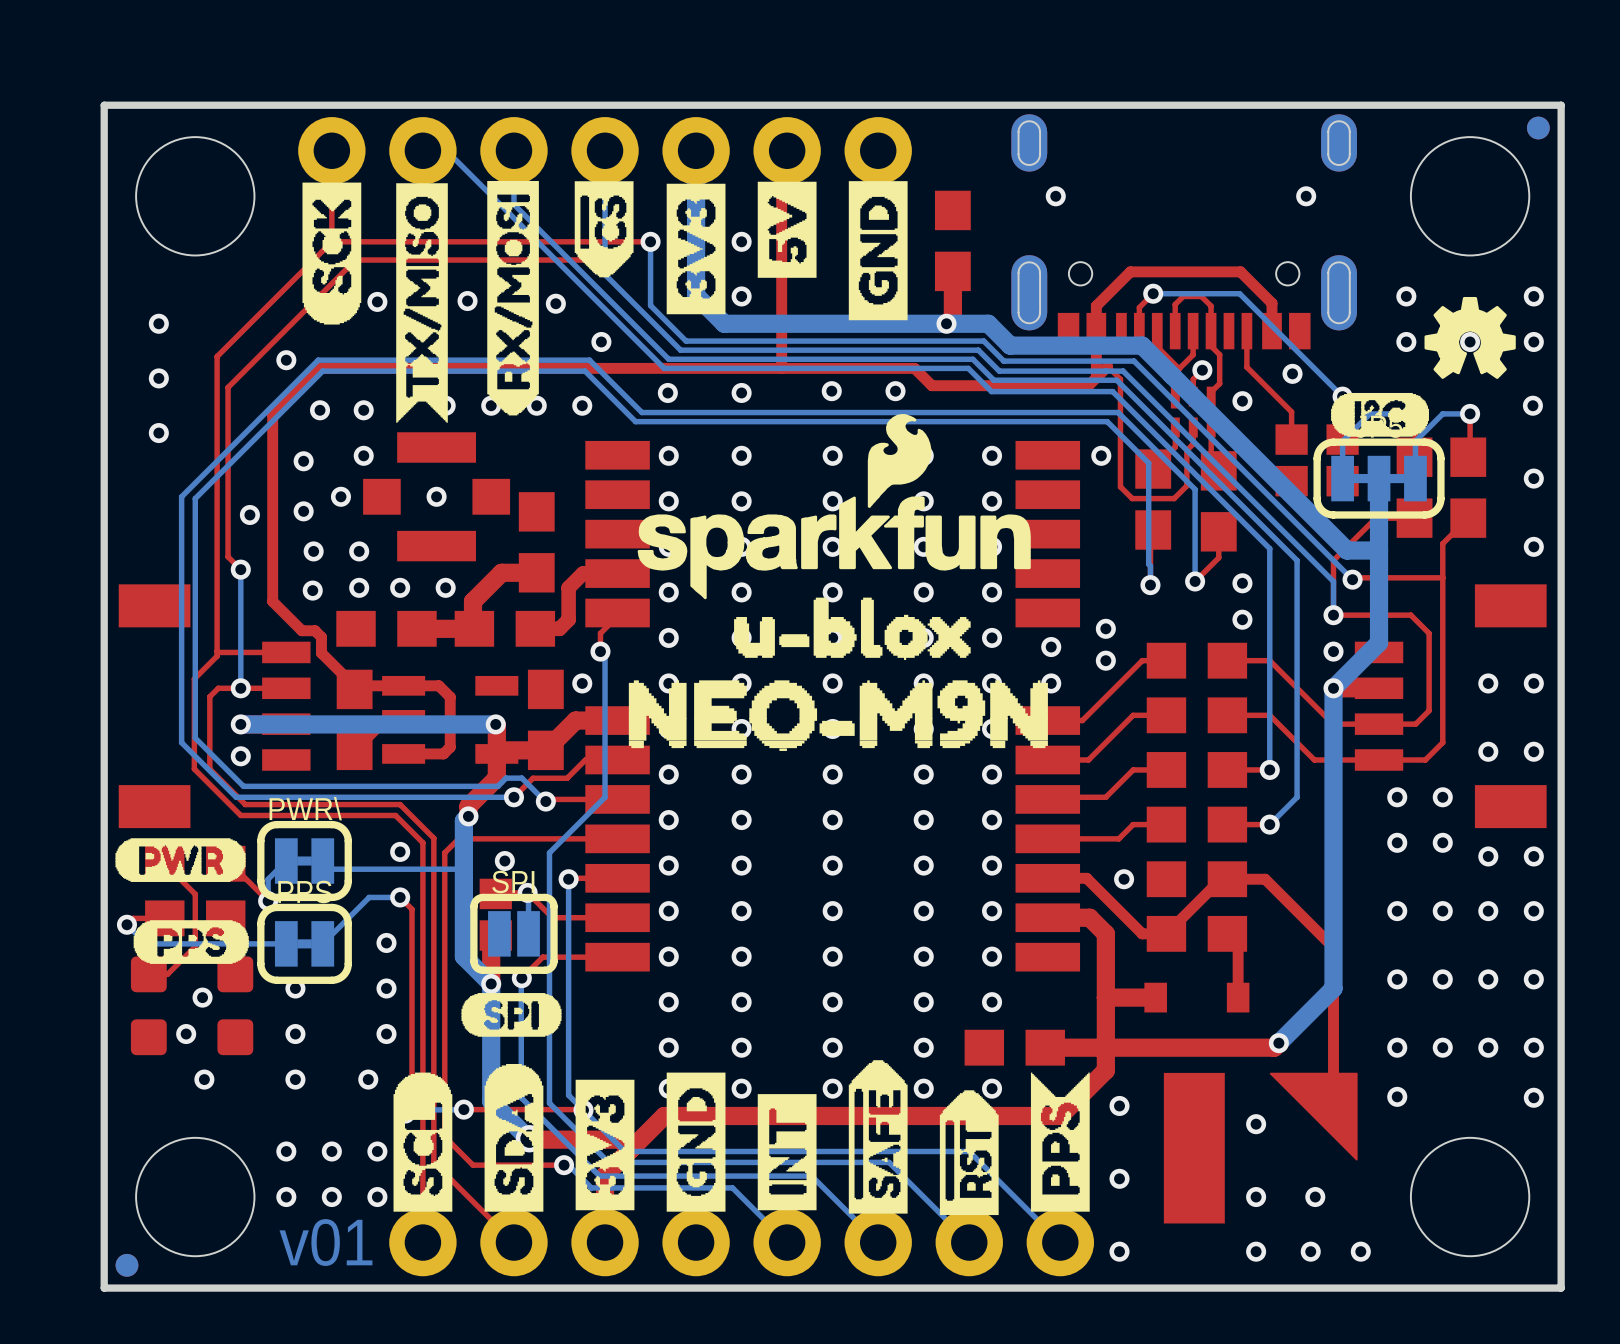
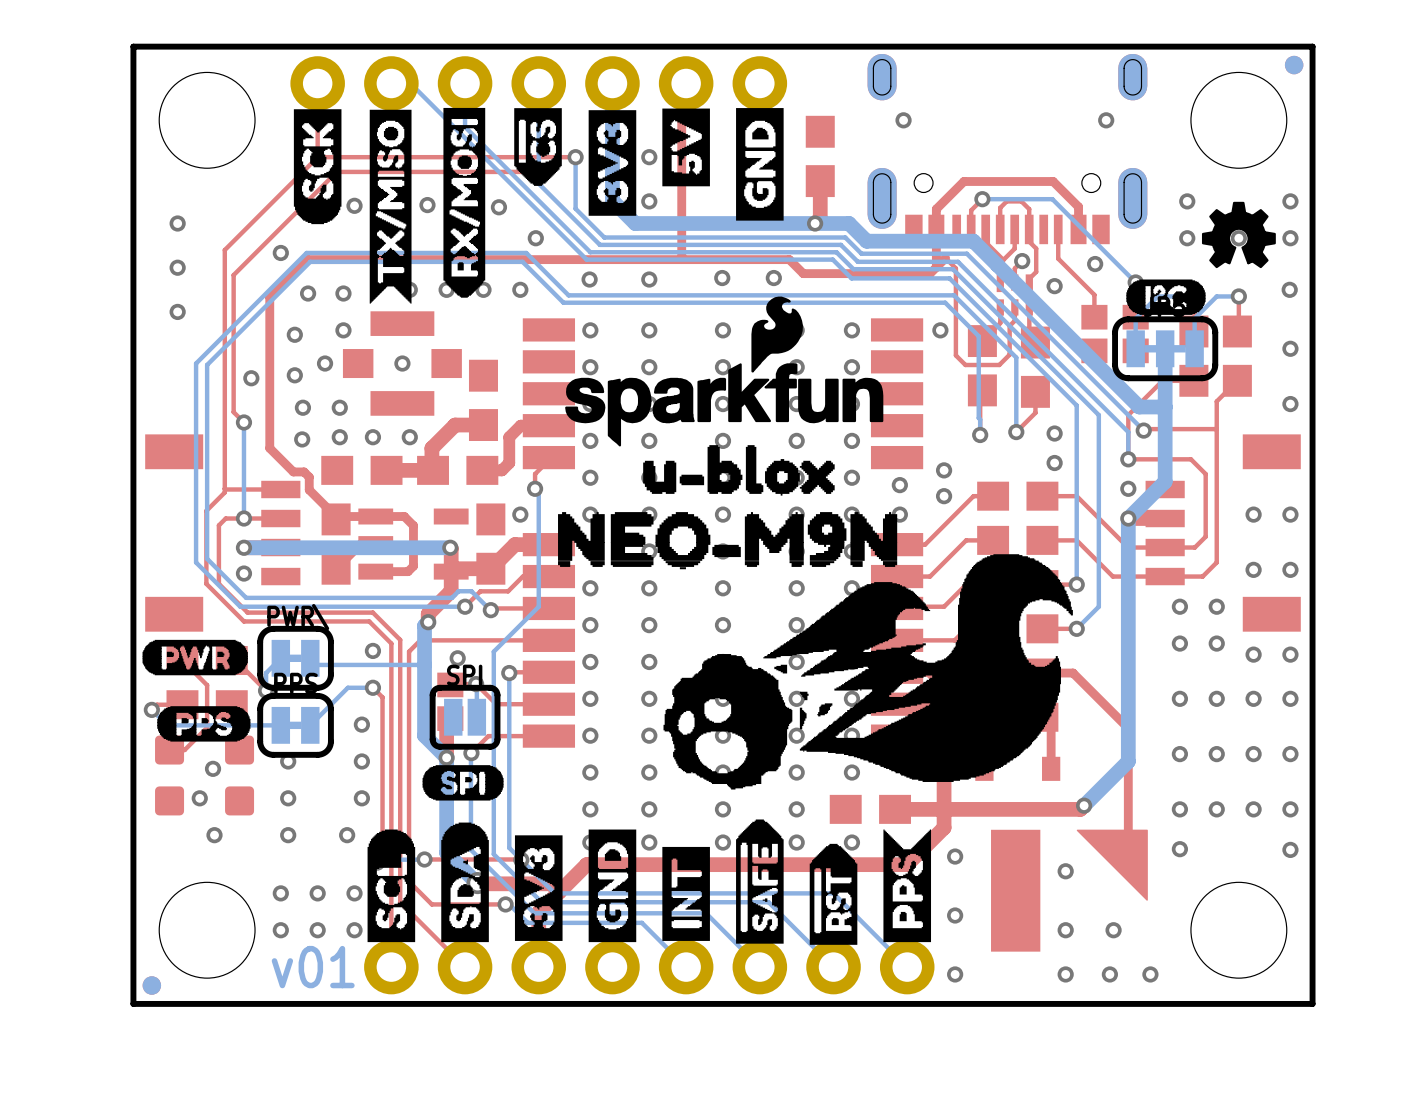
drawing: none -> [663, 554, 1073, 790]

